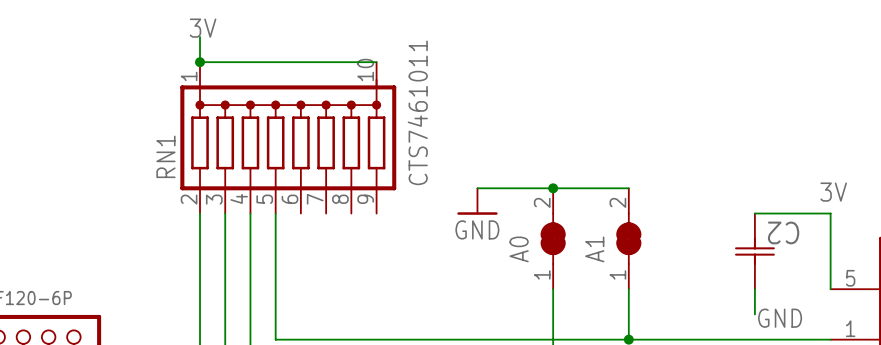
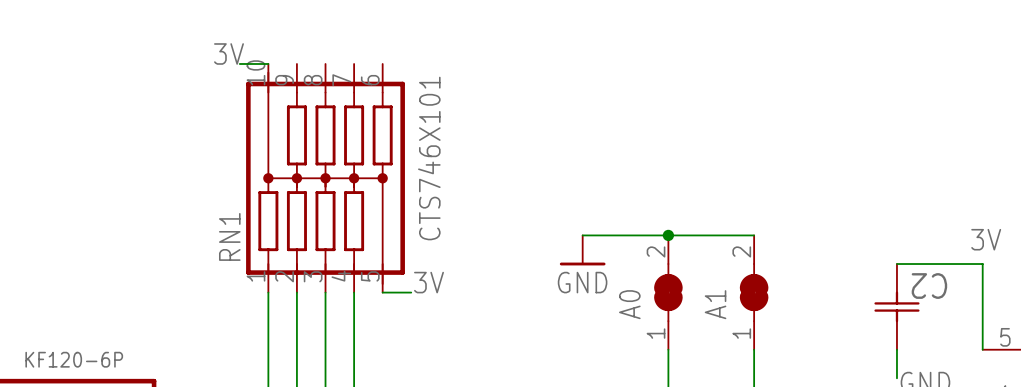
label position: 3V (203, 28) -> 3V (228, 53)
wire: (200, 36) (200, 62) (376, 62) -> (268, 63) (239, 63)
RN1 symbol: [180, 62, 397, 214] -> [246, 63, 405, 293]
junction: (200, 62) -> none
RN1 value: CTS7461011 (417, 112) -> CTS746X101 (429, 158)
RN1 name position: RN1 (165, 156) -> RN1 (229, 236)
label: none -> 3V (429, 282)
wire: none -> (382, 292) (411, 292)

